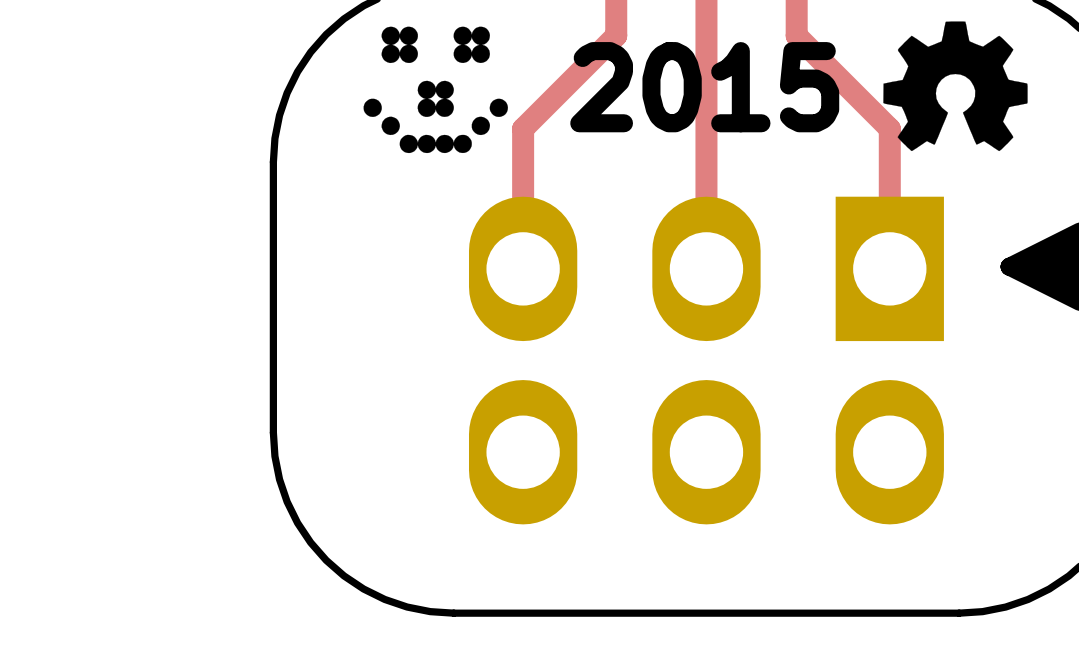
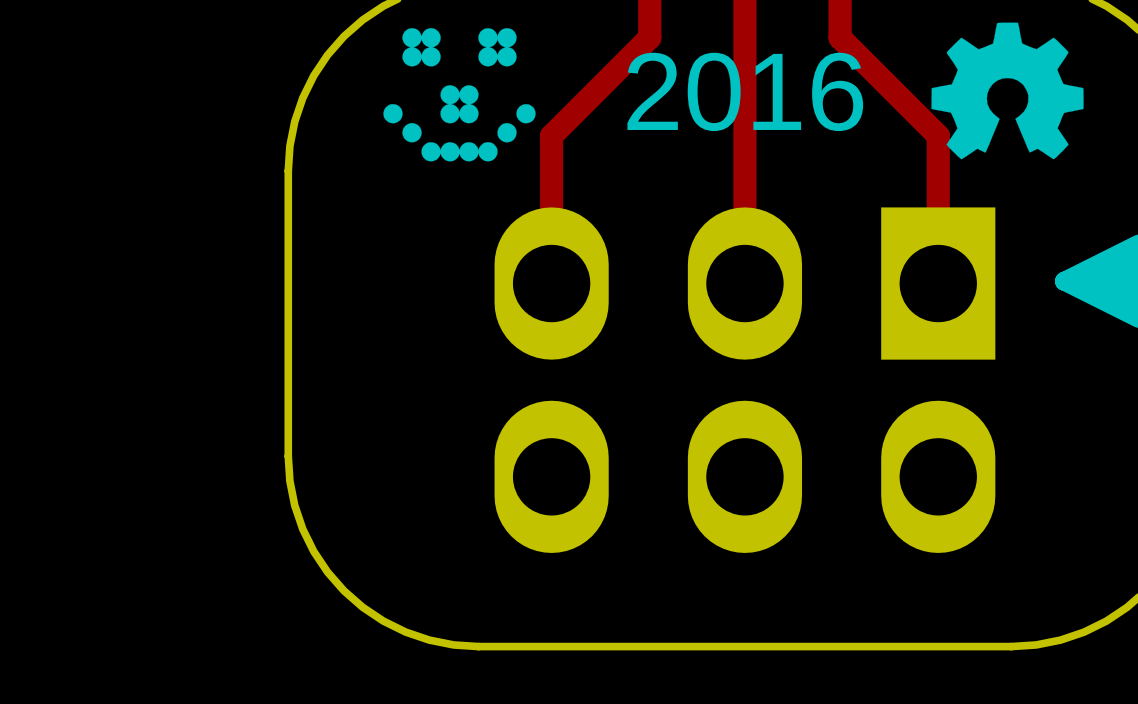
text: 2015 (704, 87) -> 2016 (745, 91)

